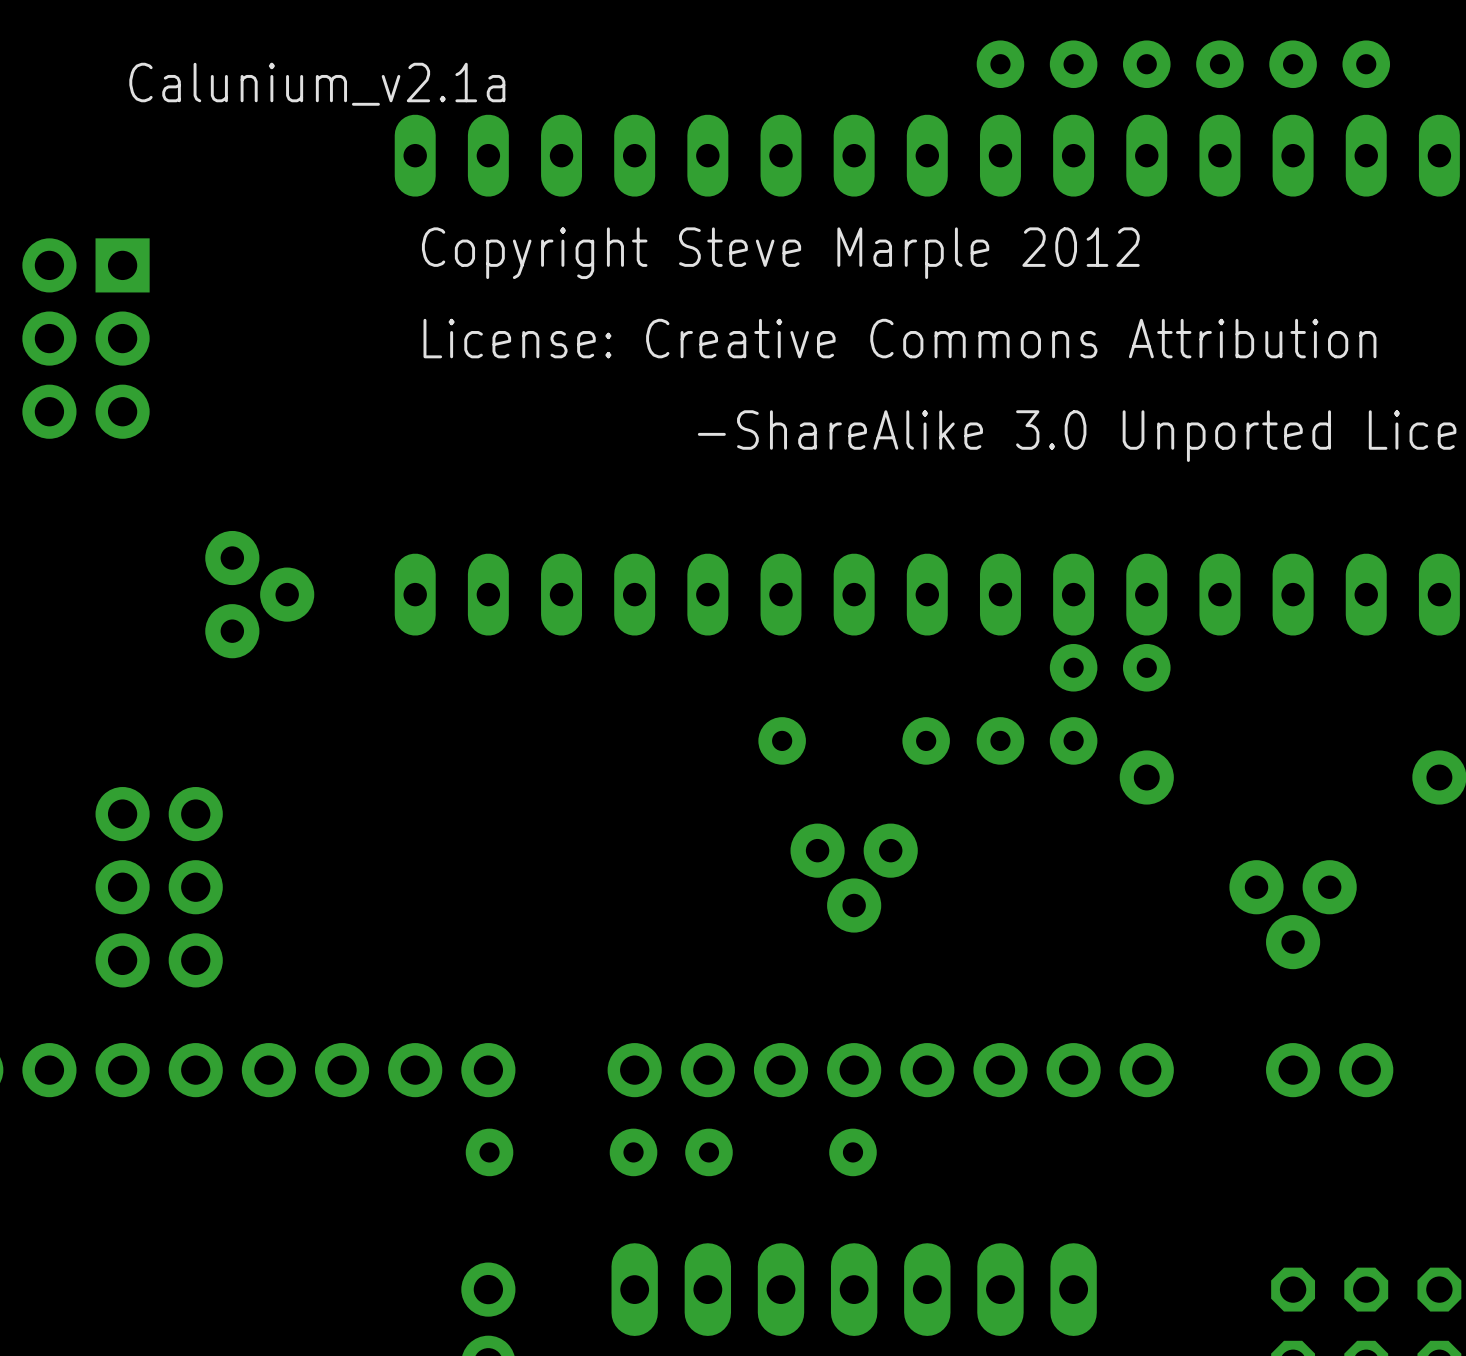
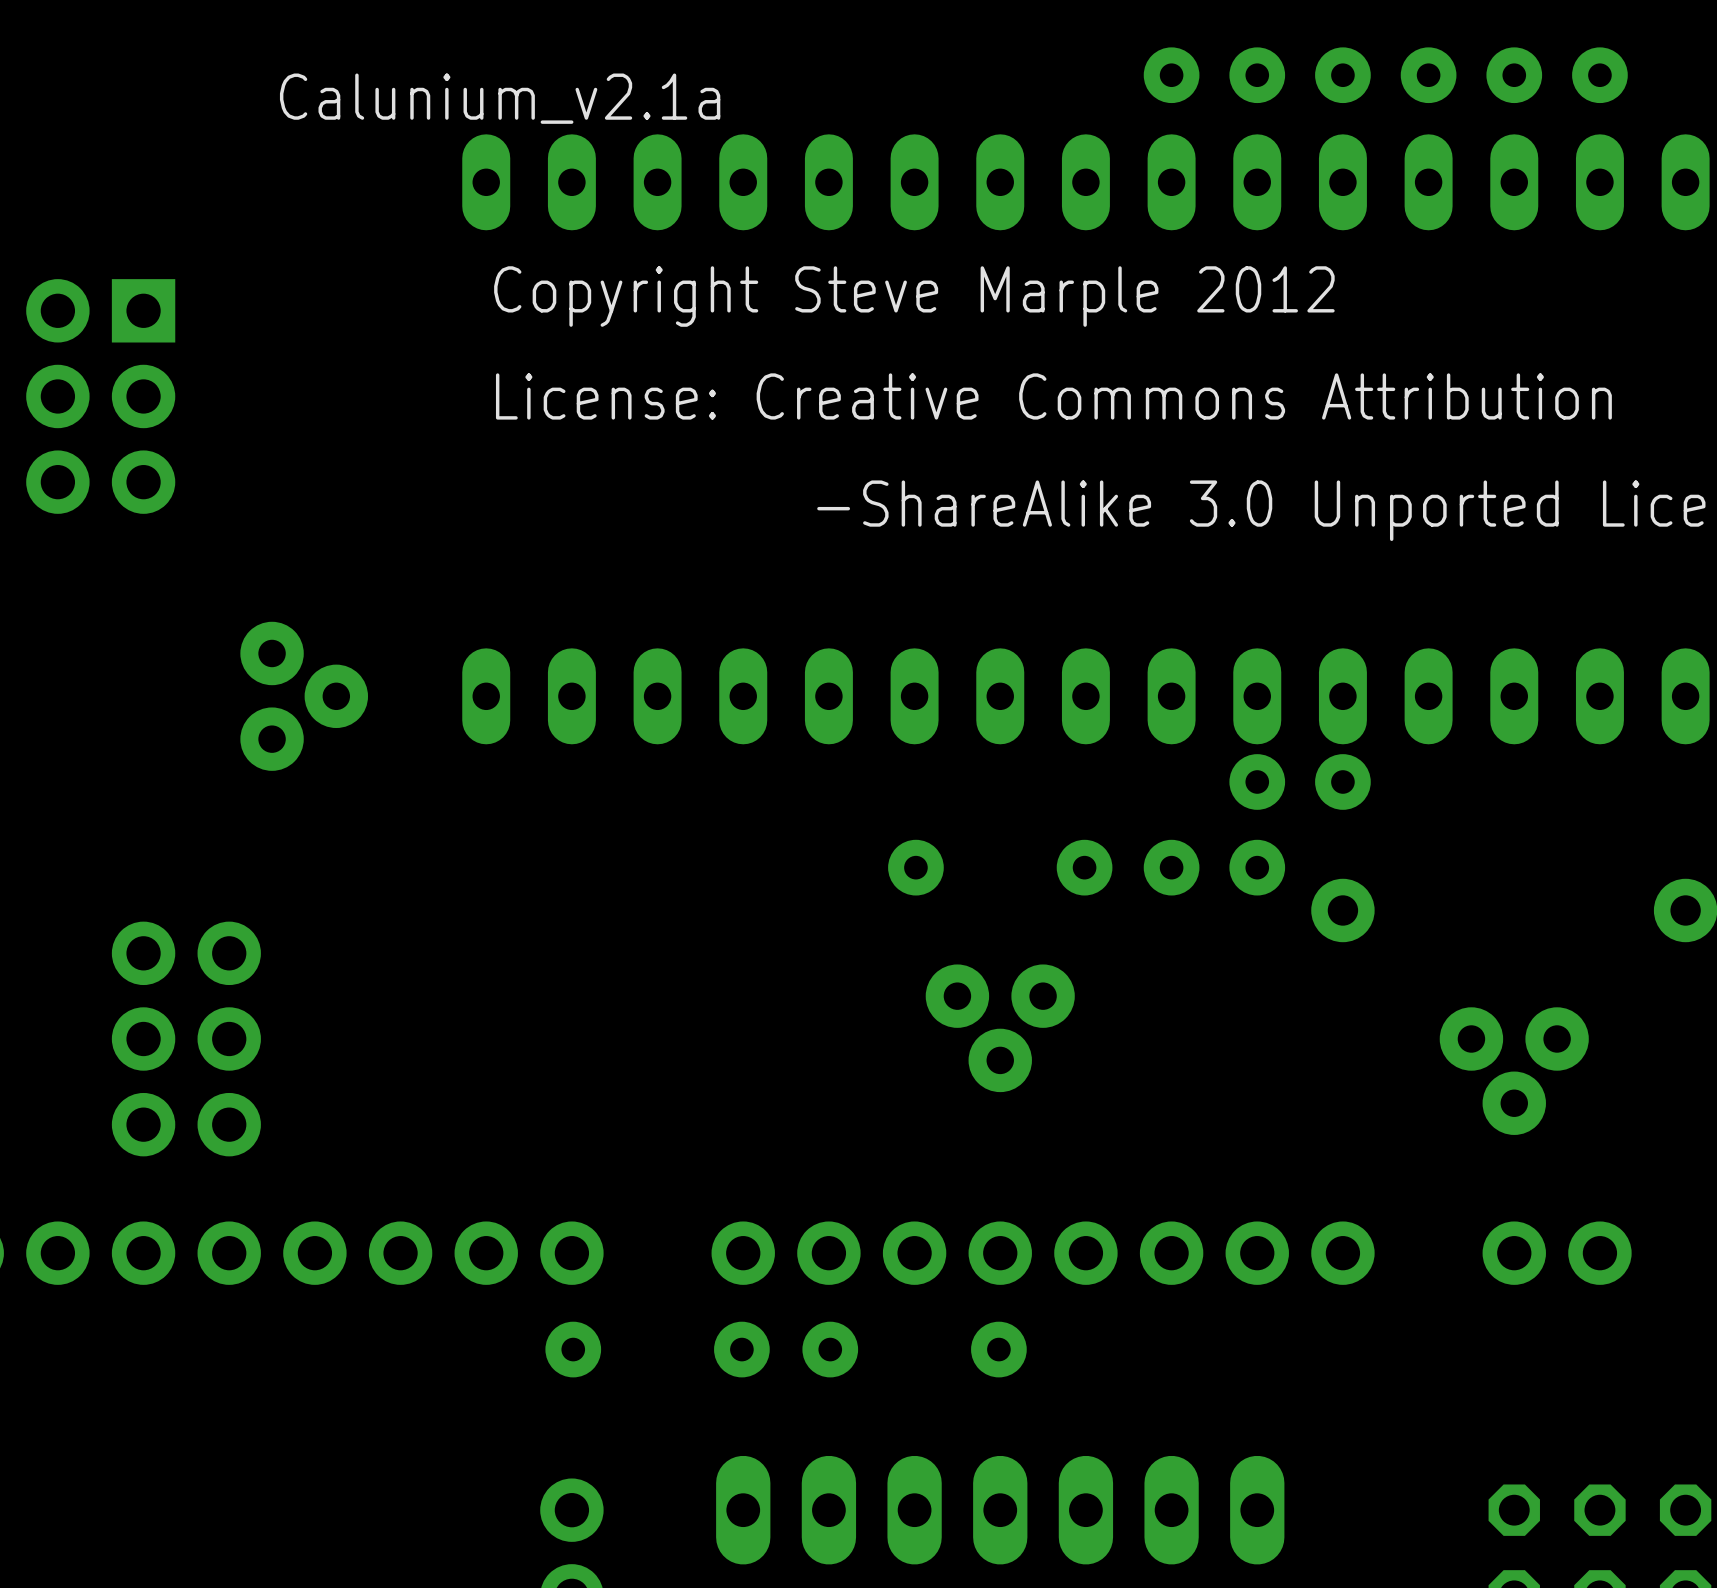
text position: Calunium_v2.1a (317, 84) -> Calunium_v2.1a (500, 98)

